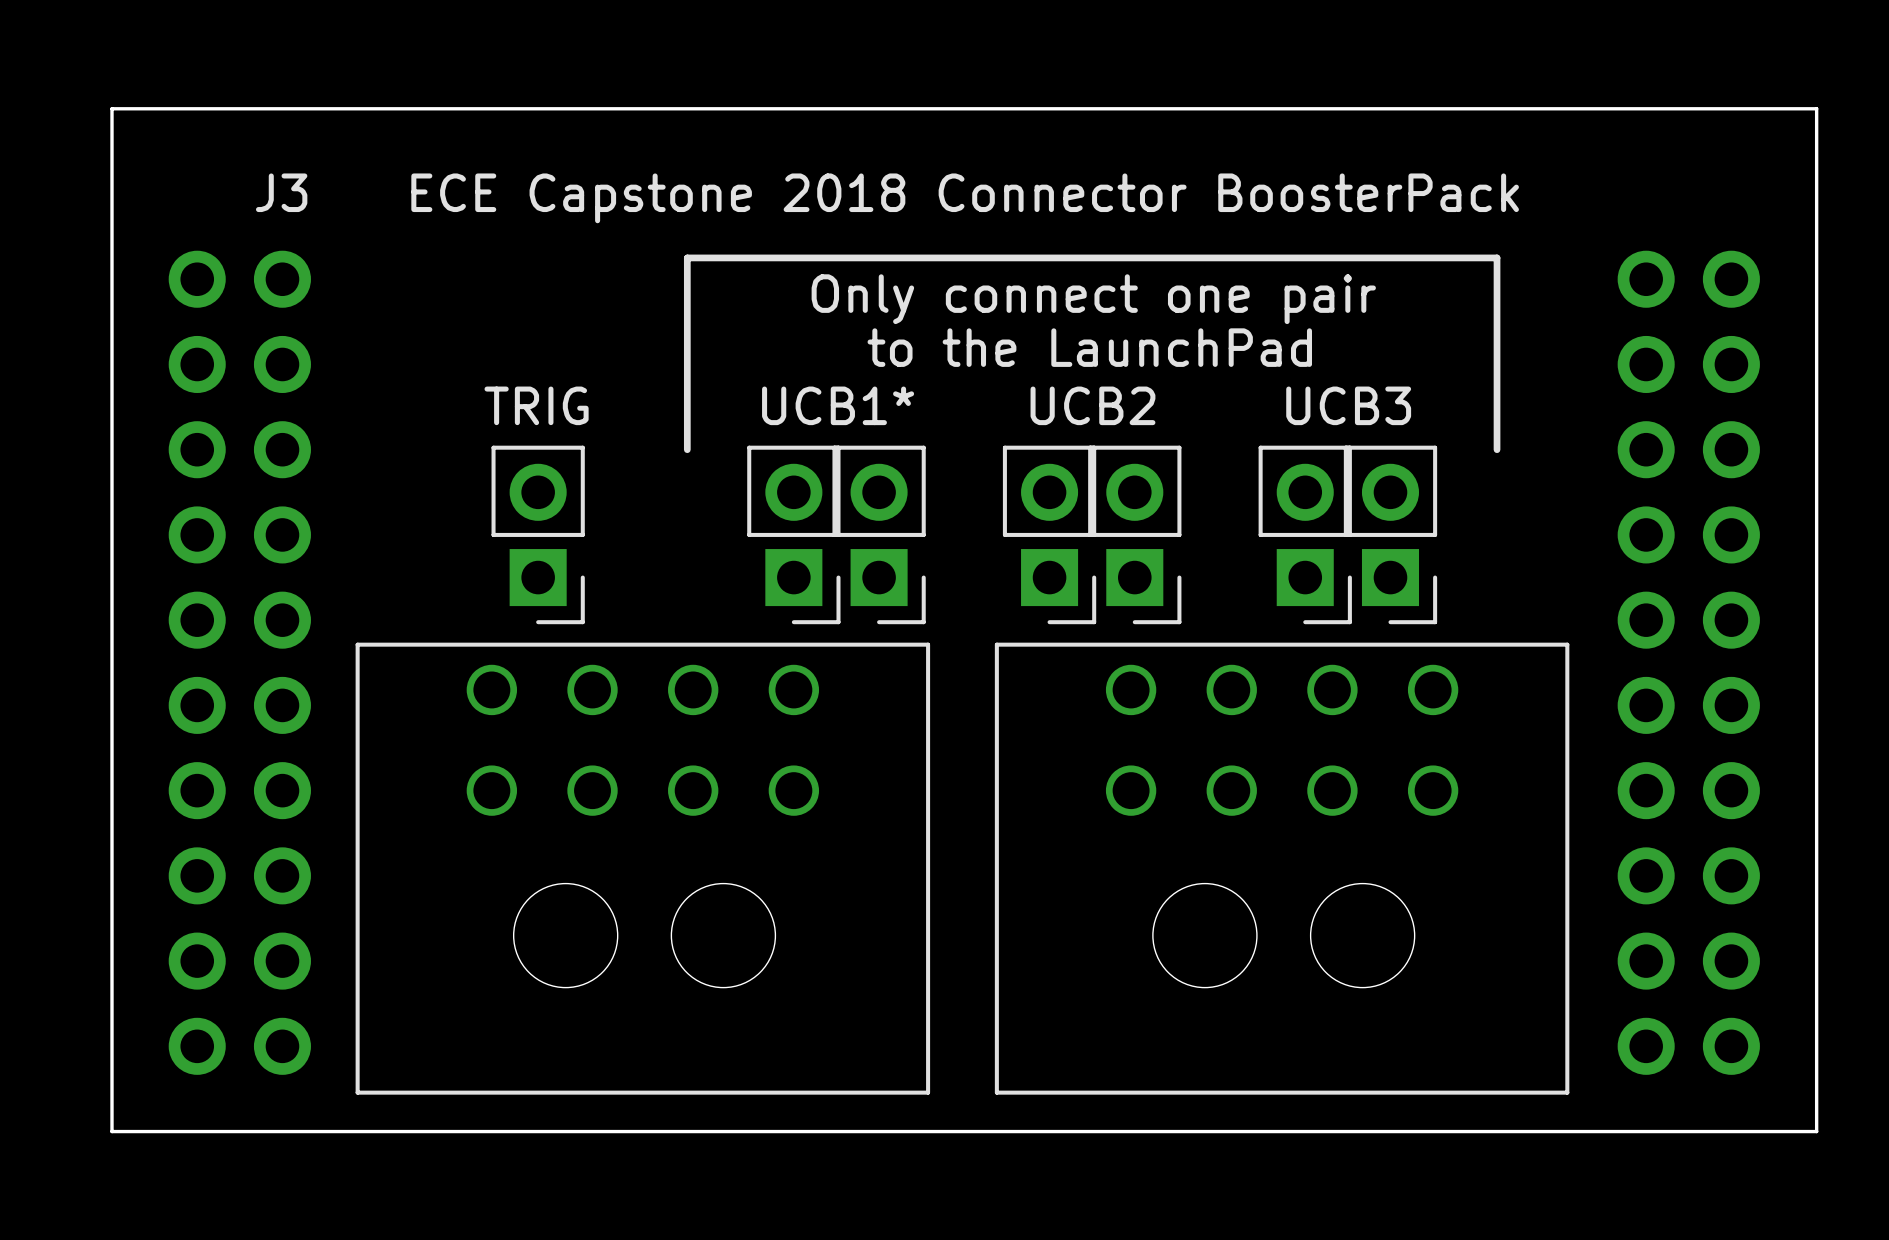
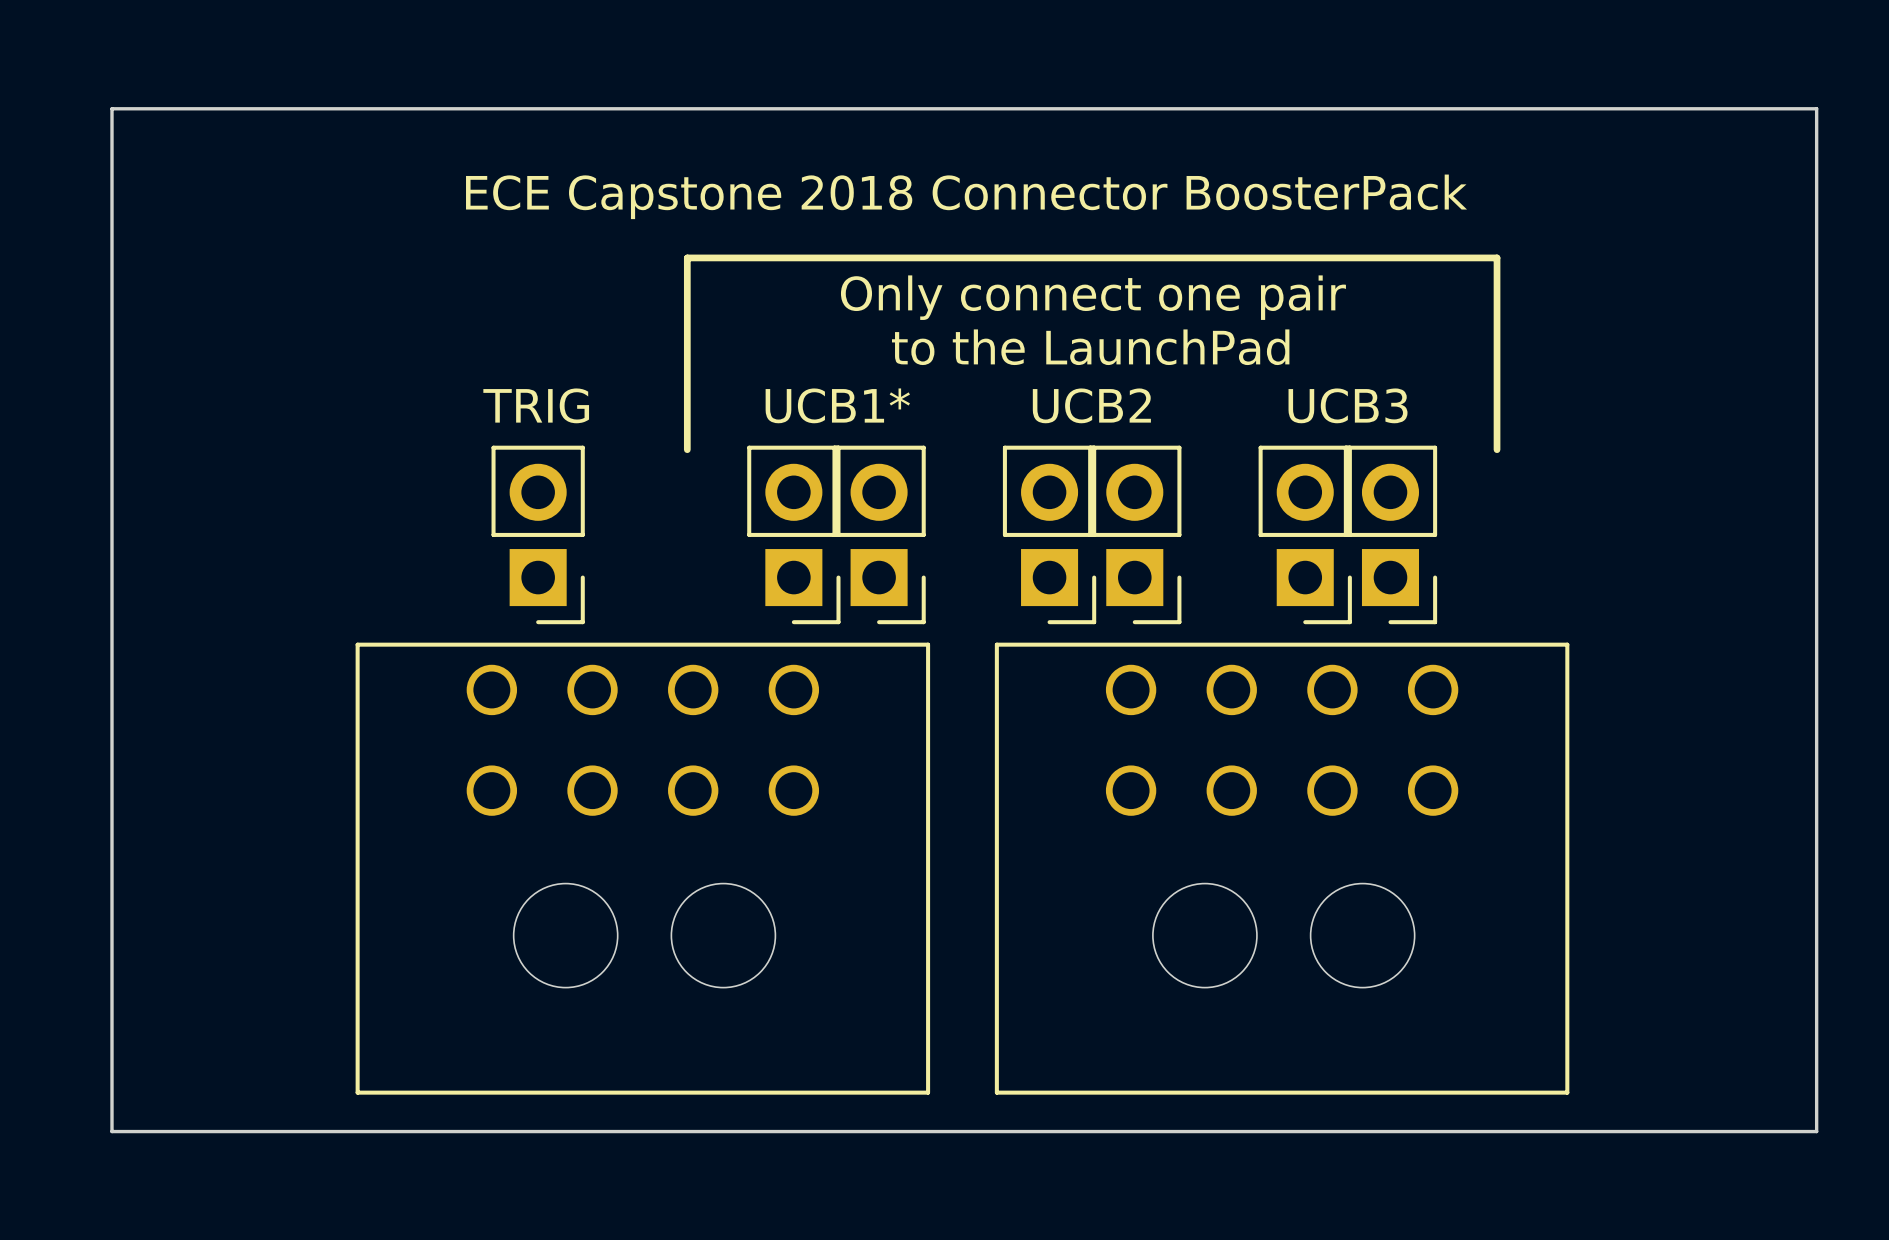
J3: (964, 662) -> none

